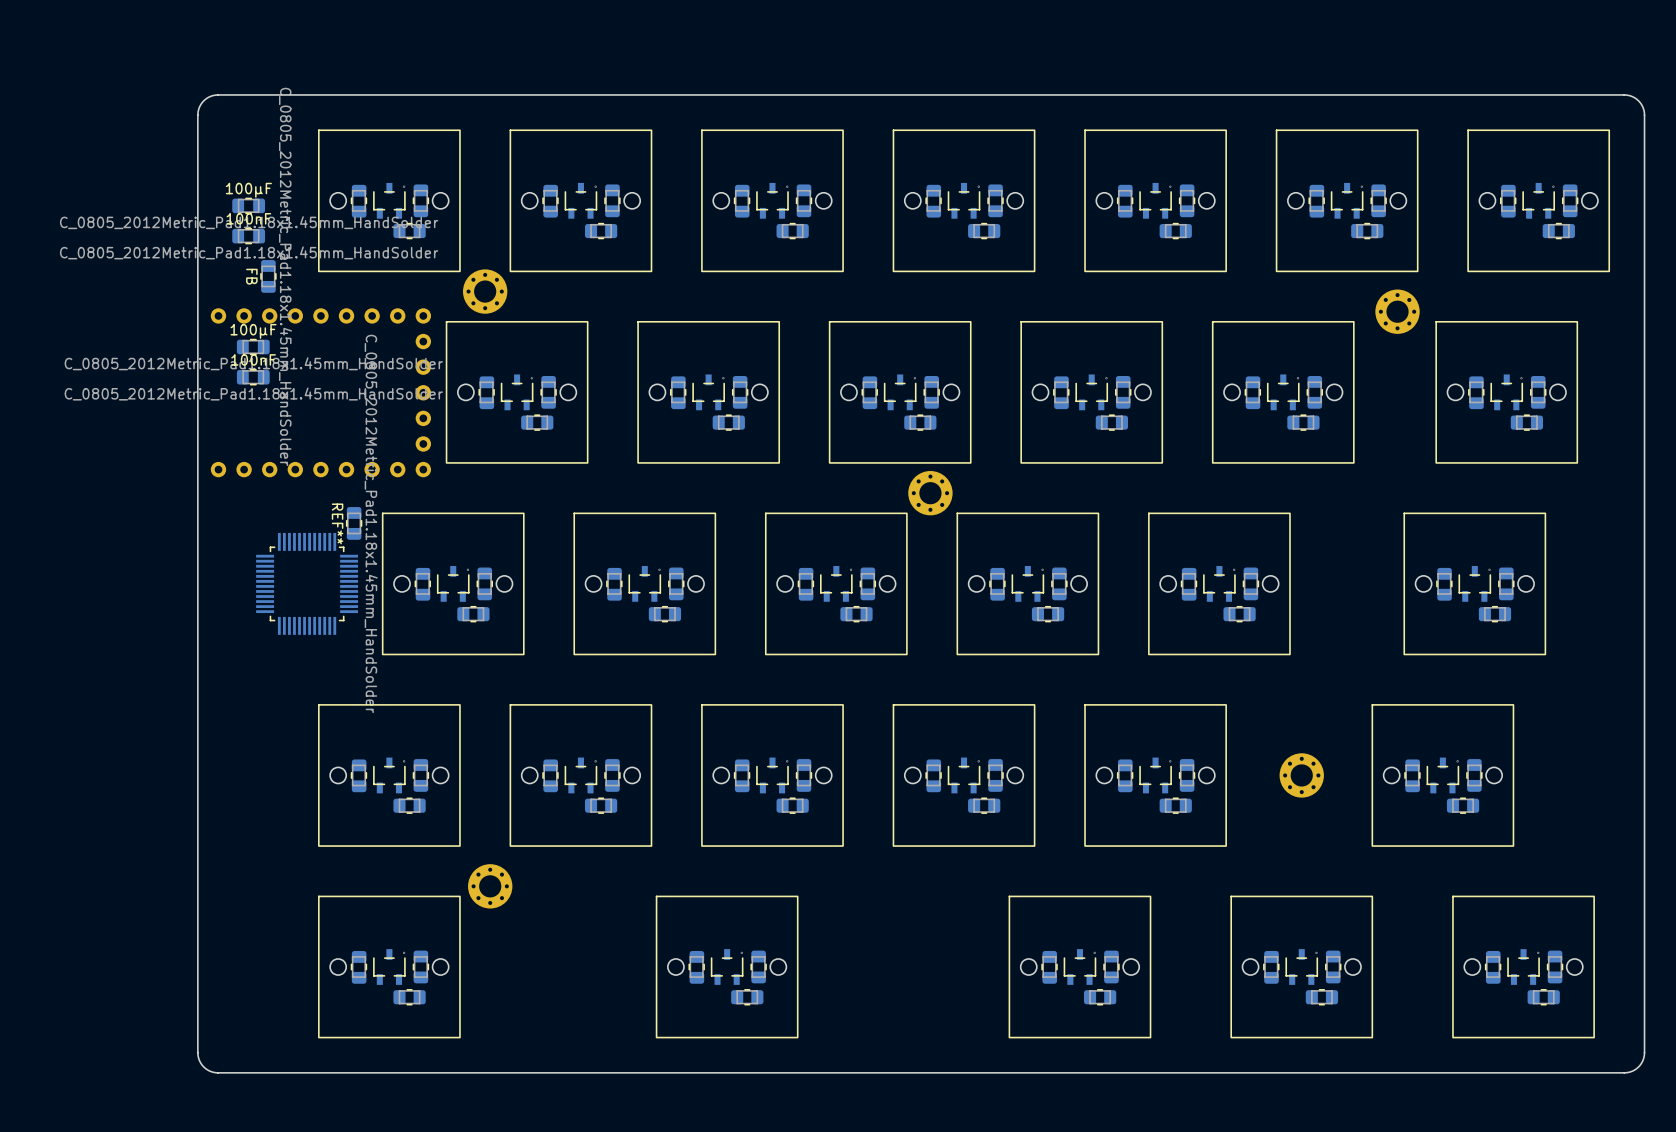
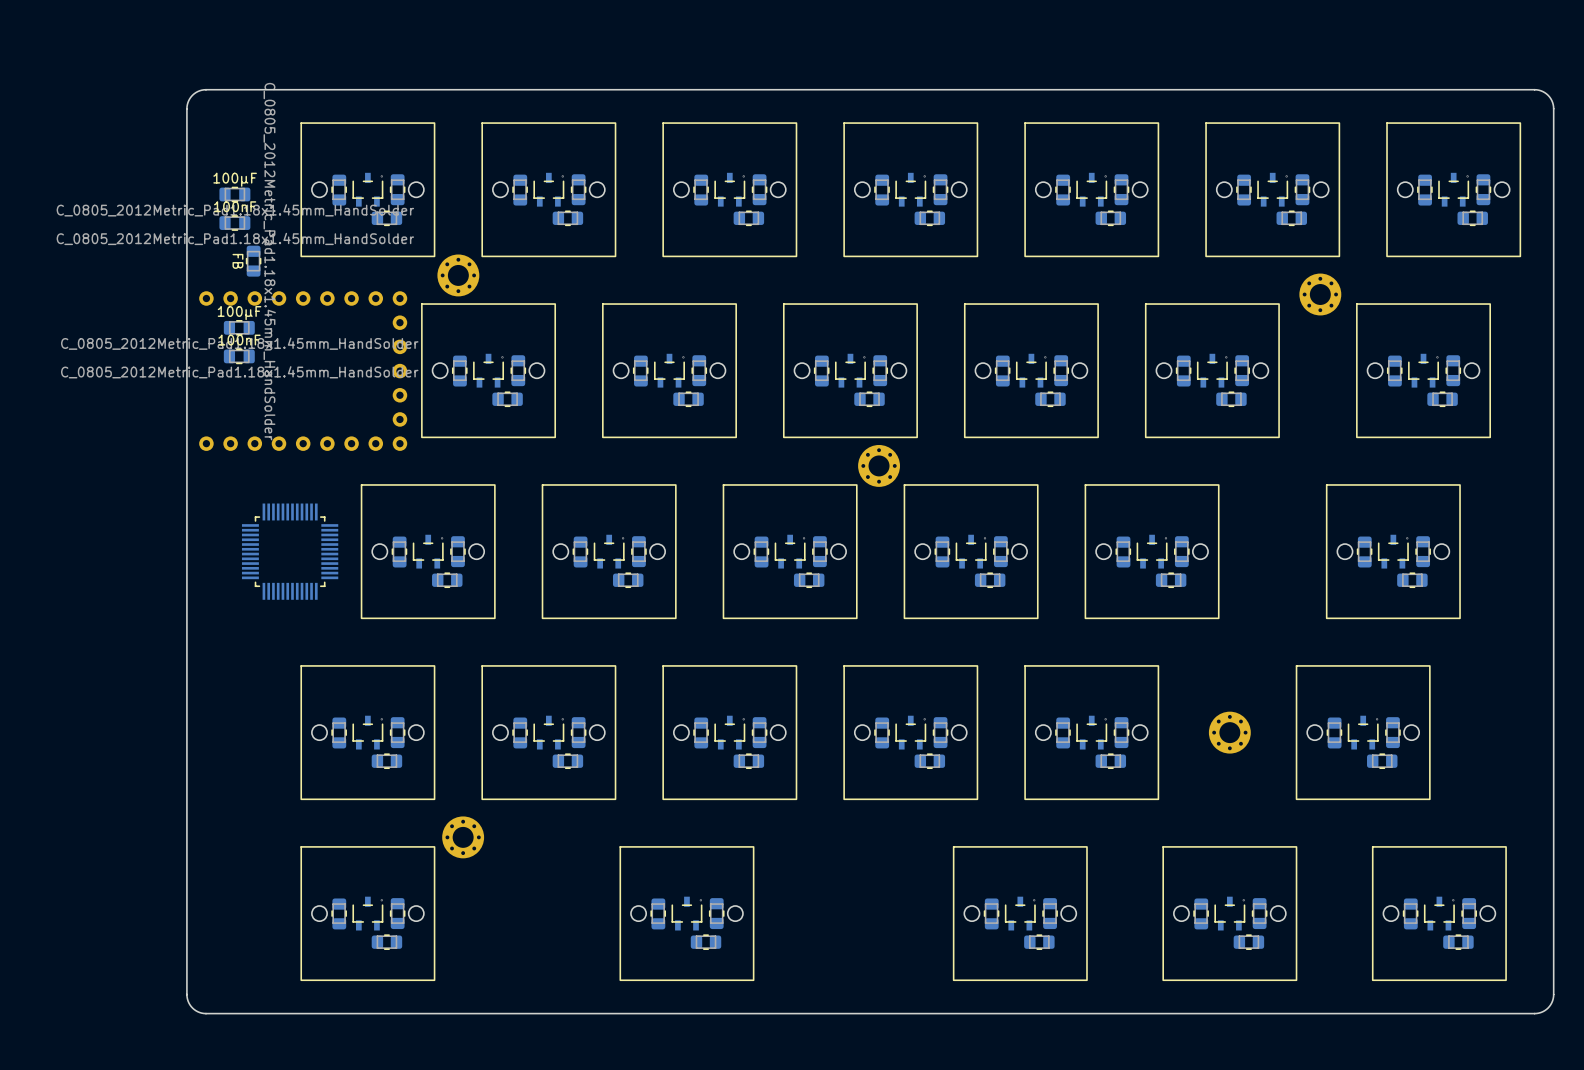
REF**: C_0805_2012Metric_Pad1.18x1.45mm_HandSolder (354, 523) -> none

